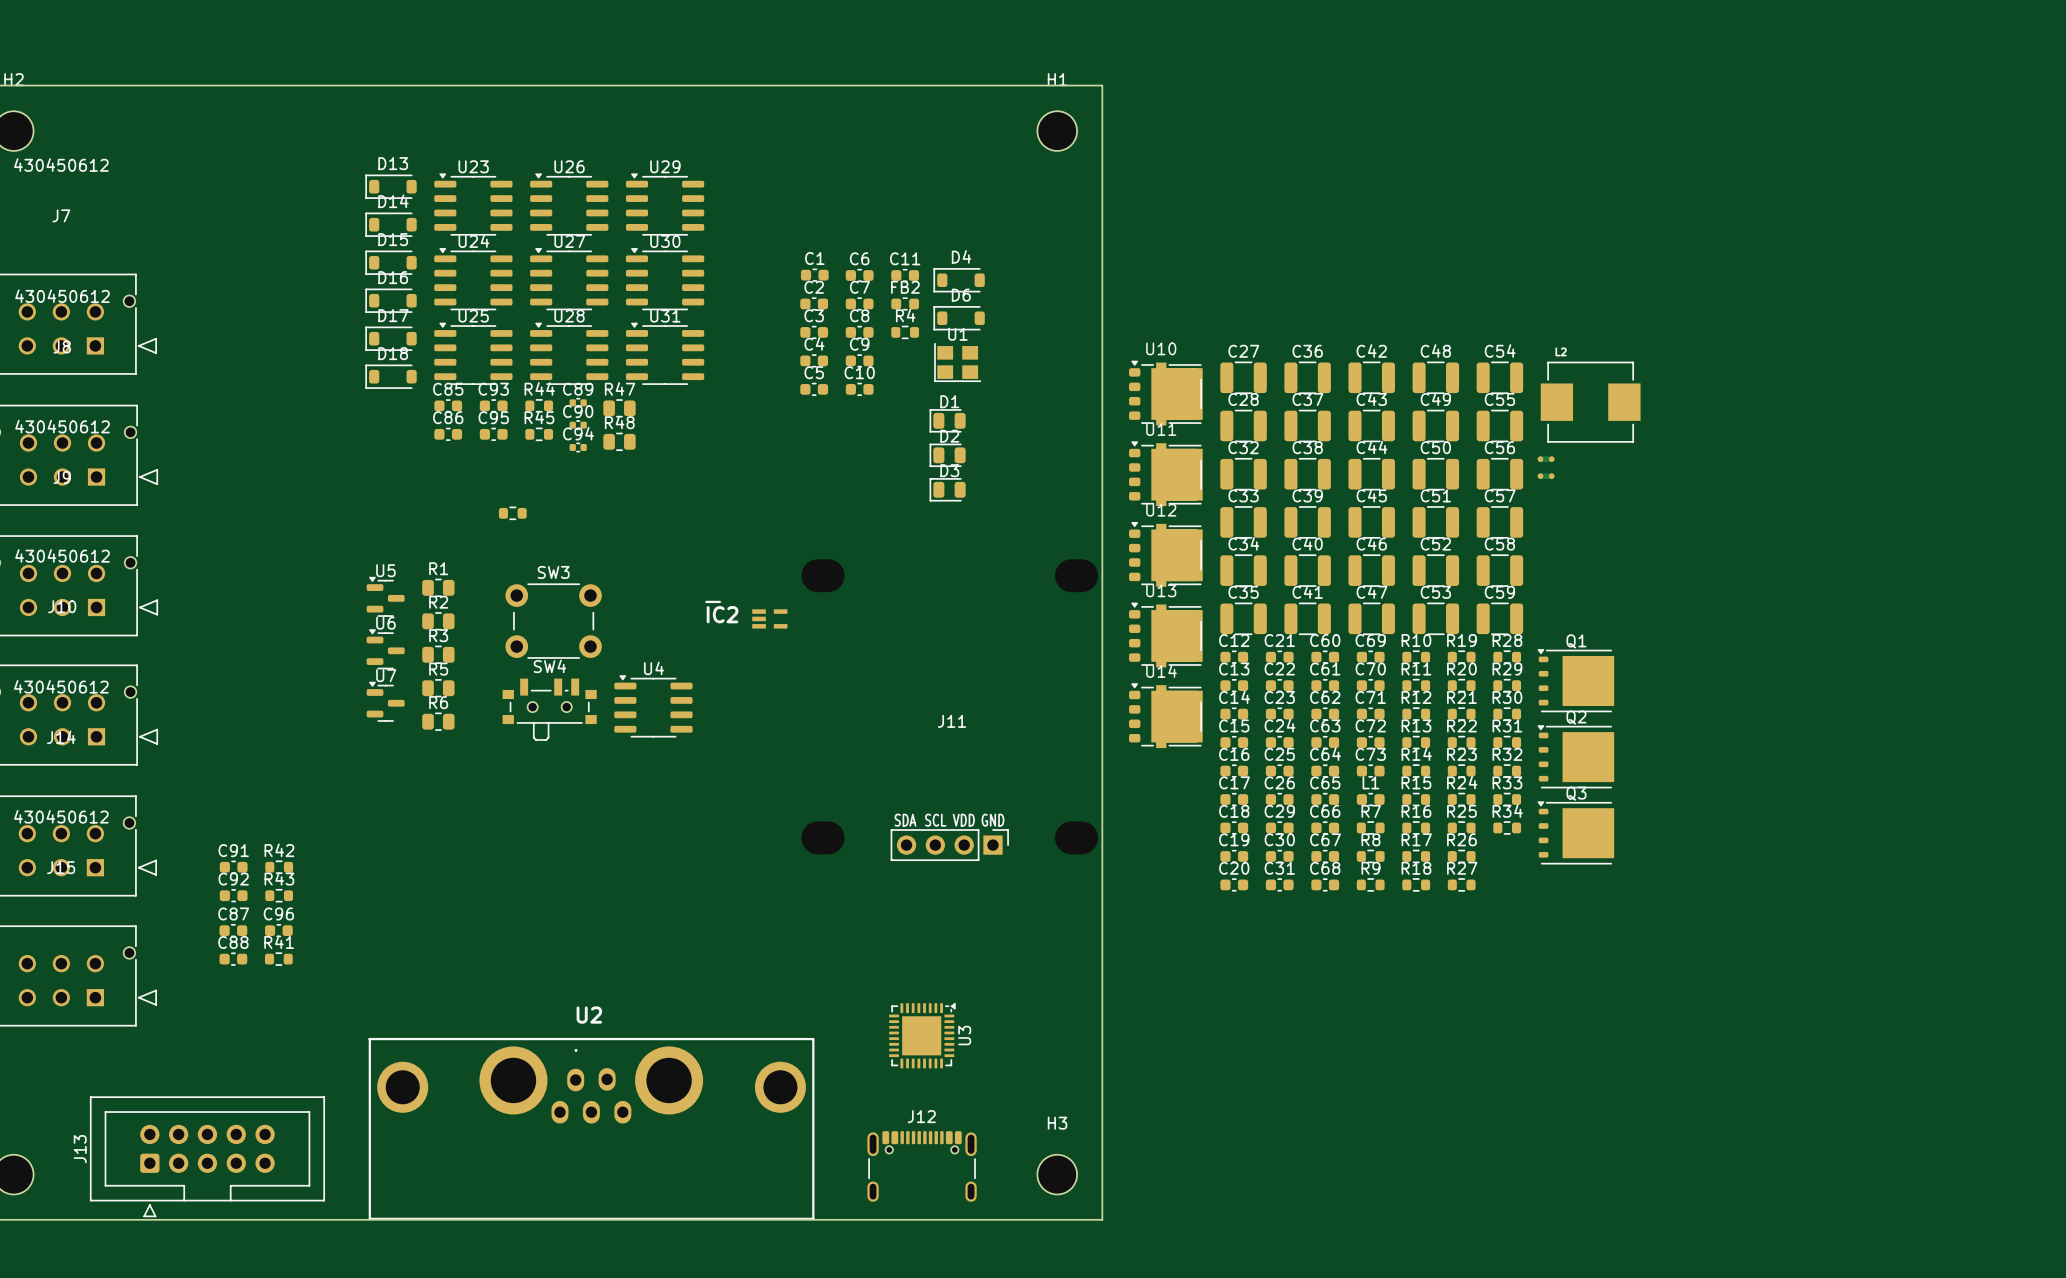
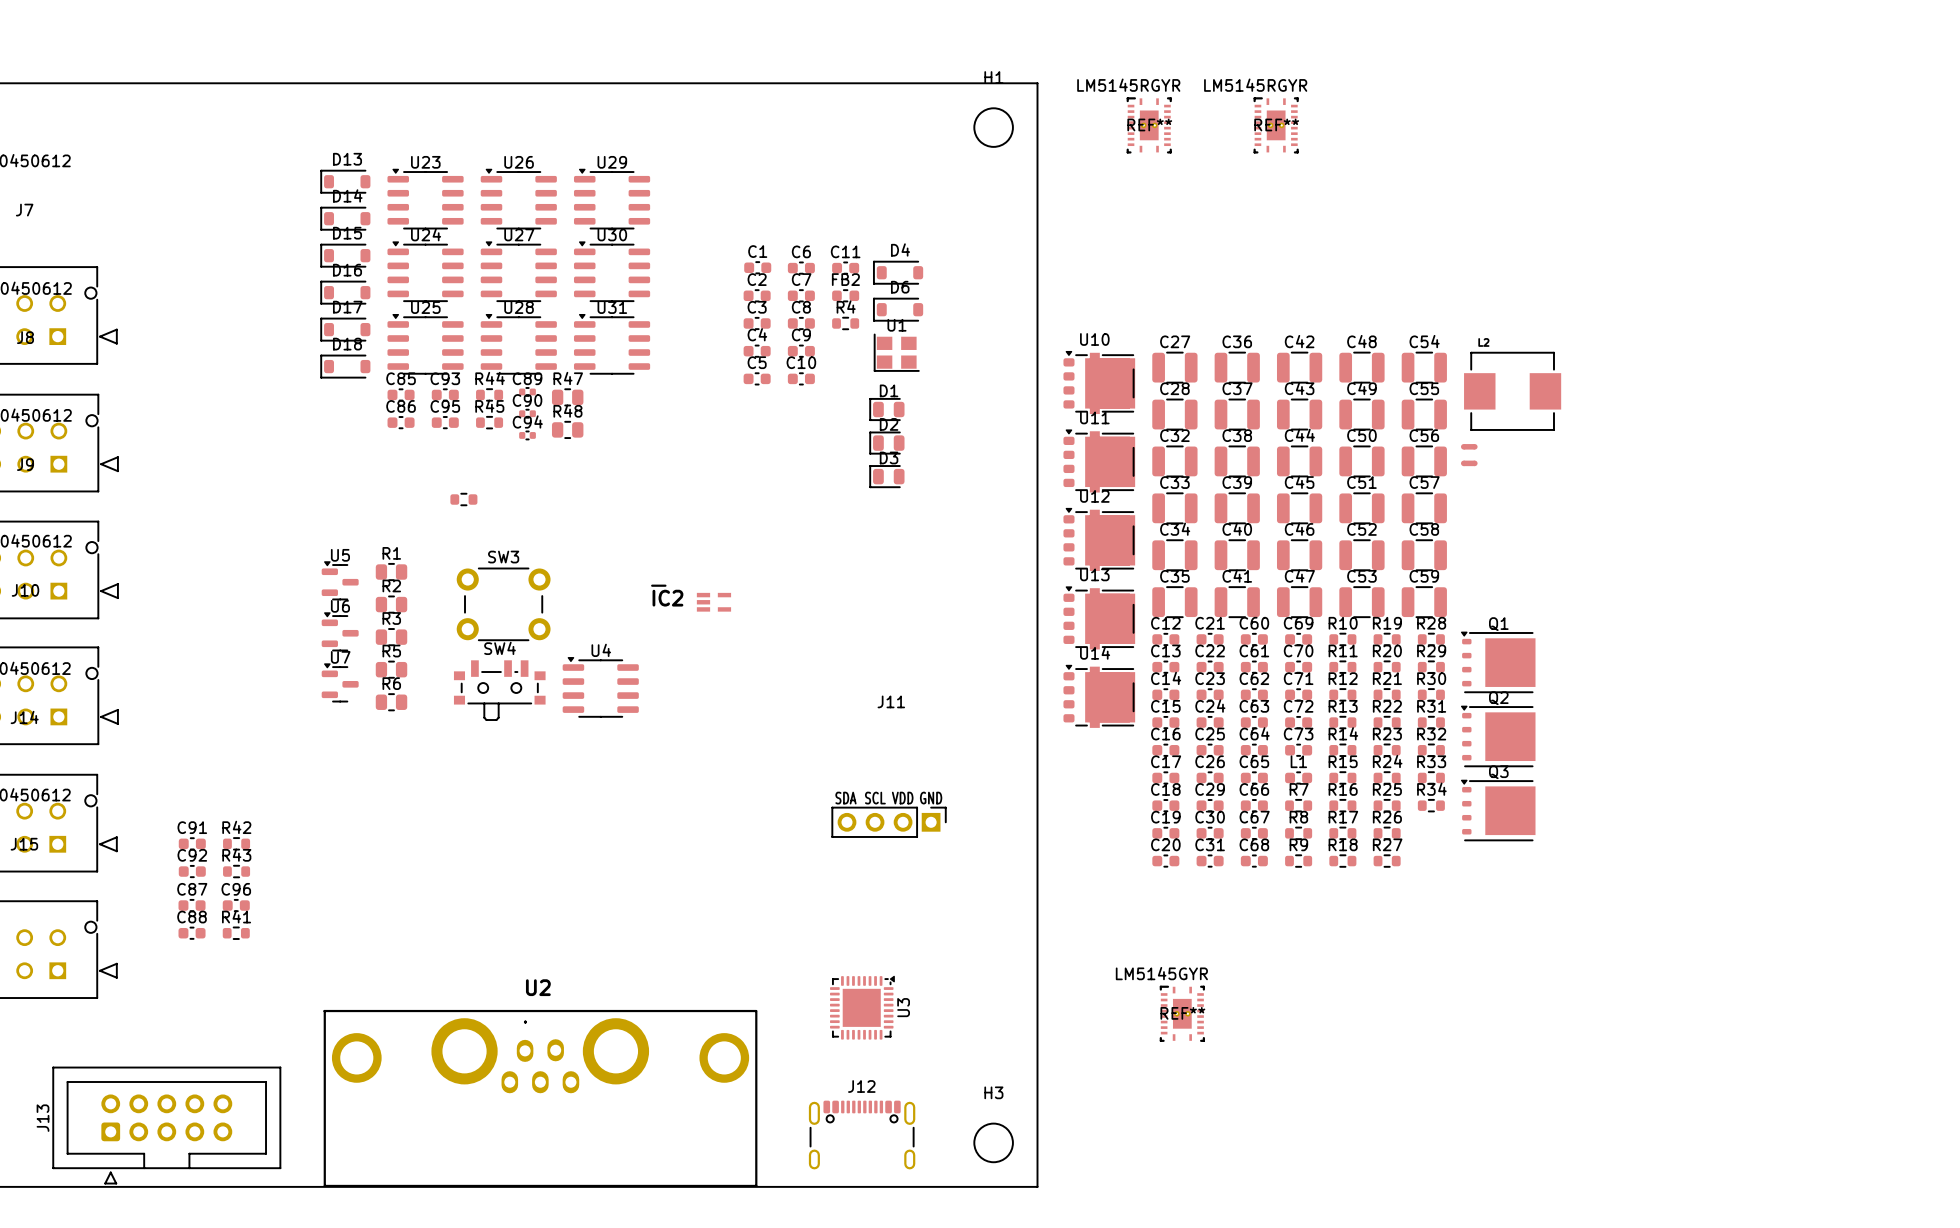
REF**: none -> (1149, 125)
REF**: none -> (1276, 125)
REF**: none -> (1182, 1013)

